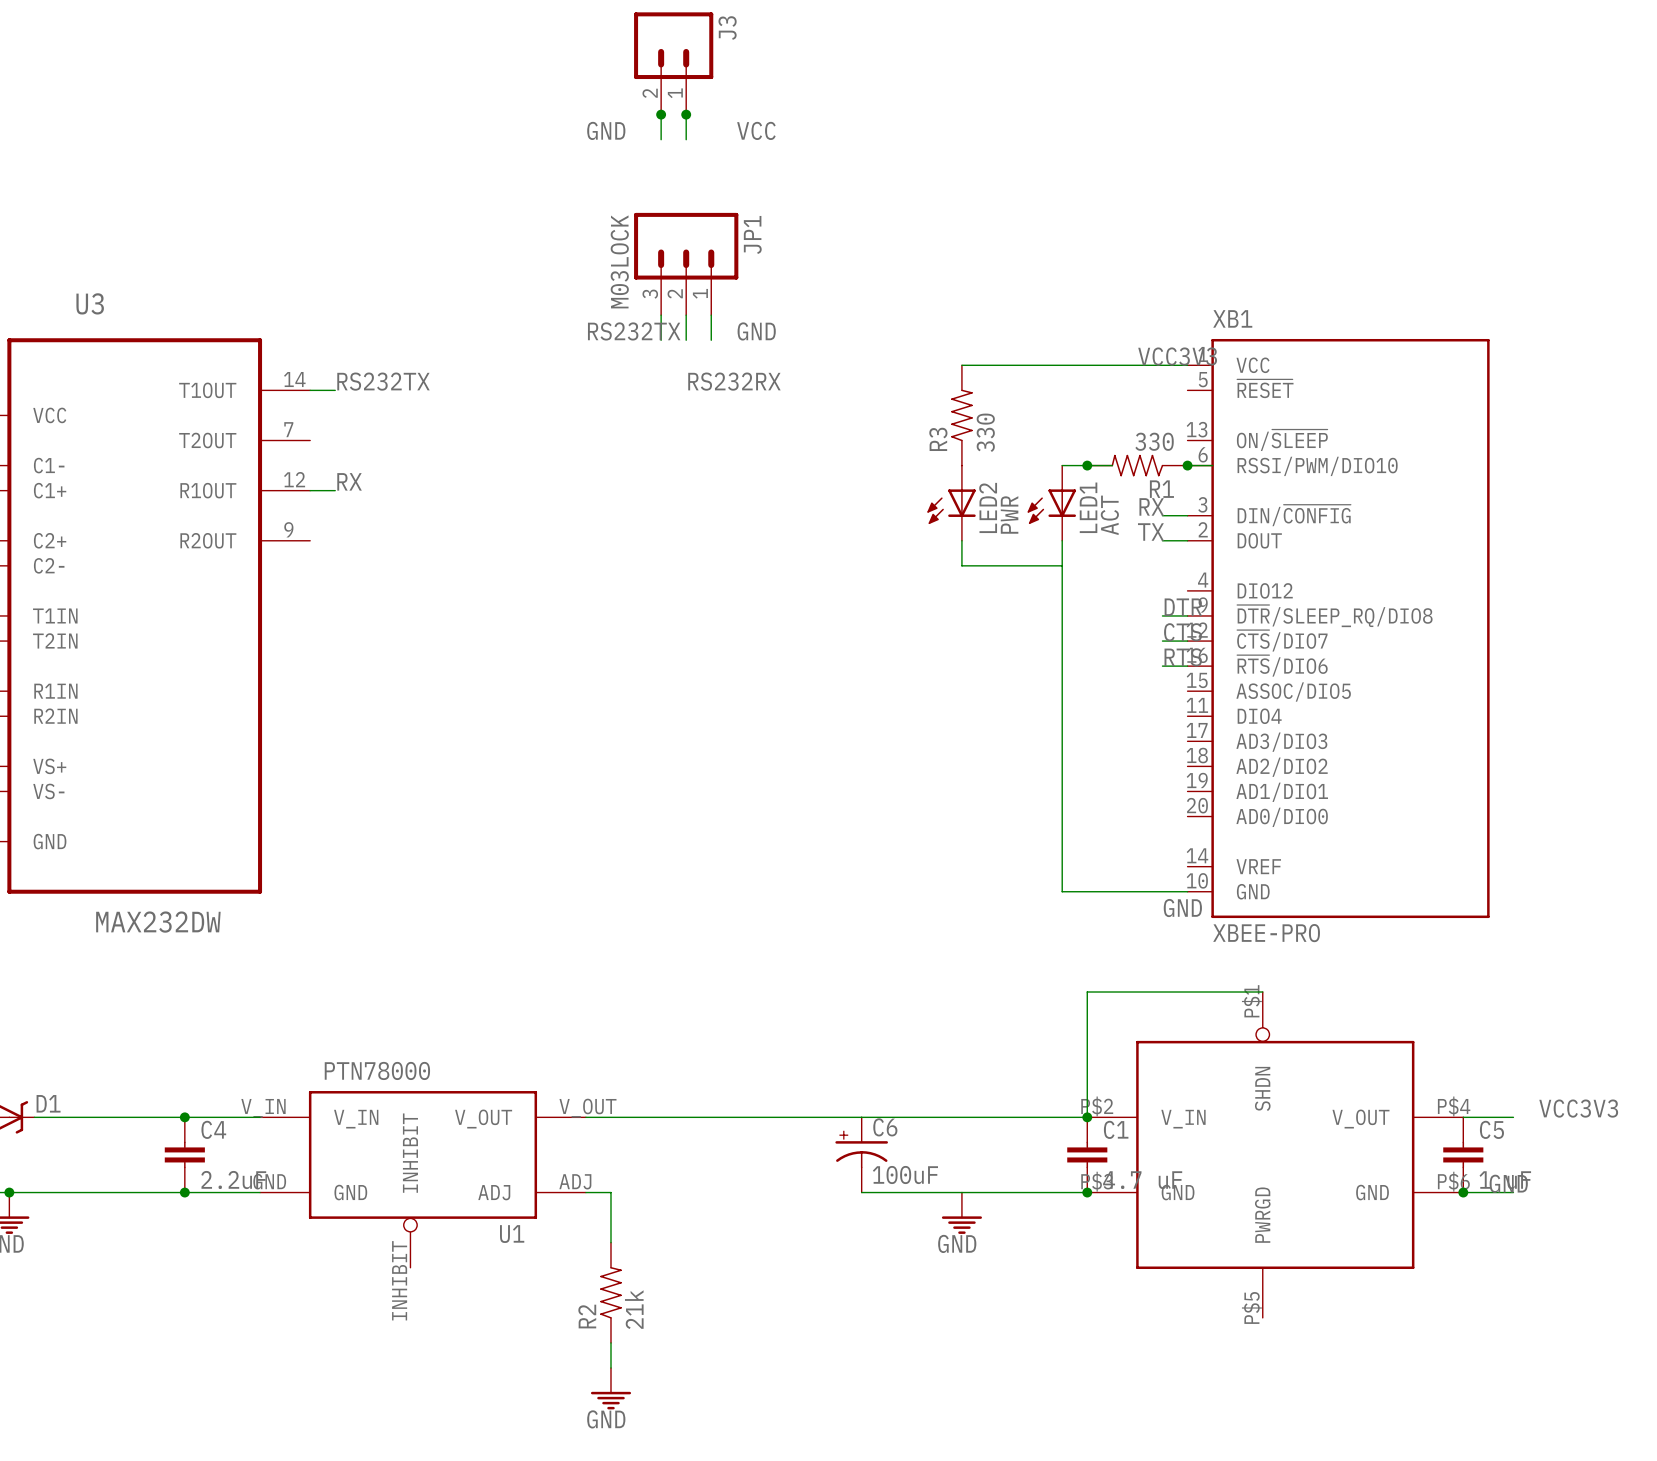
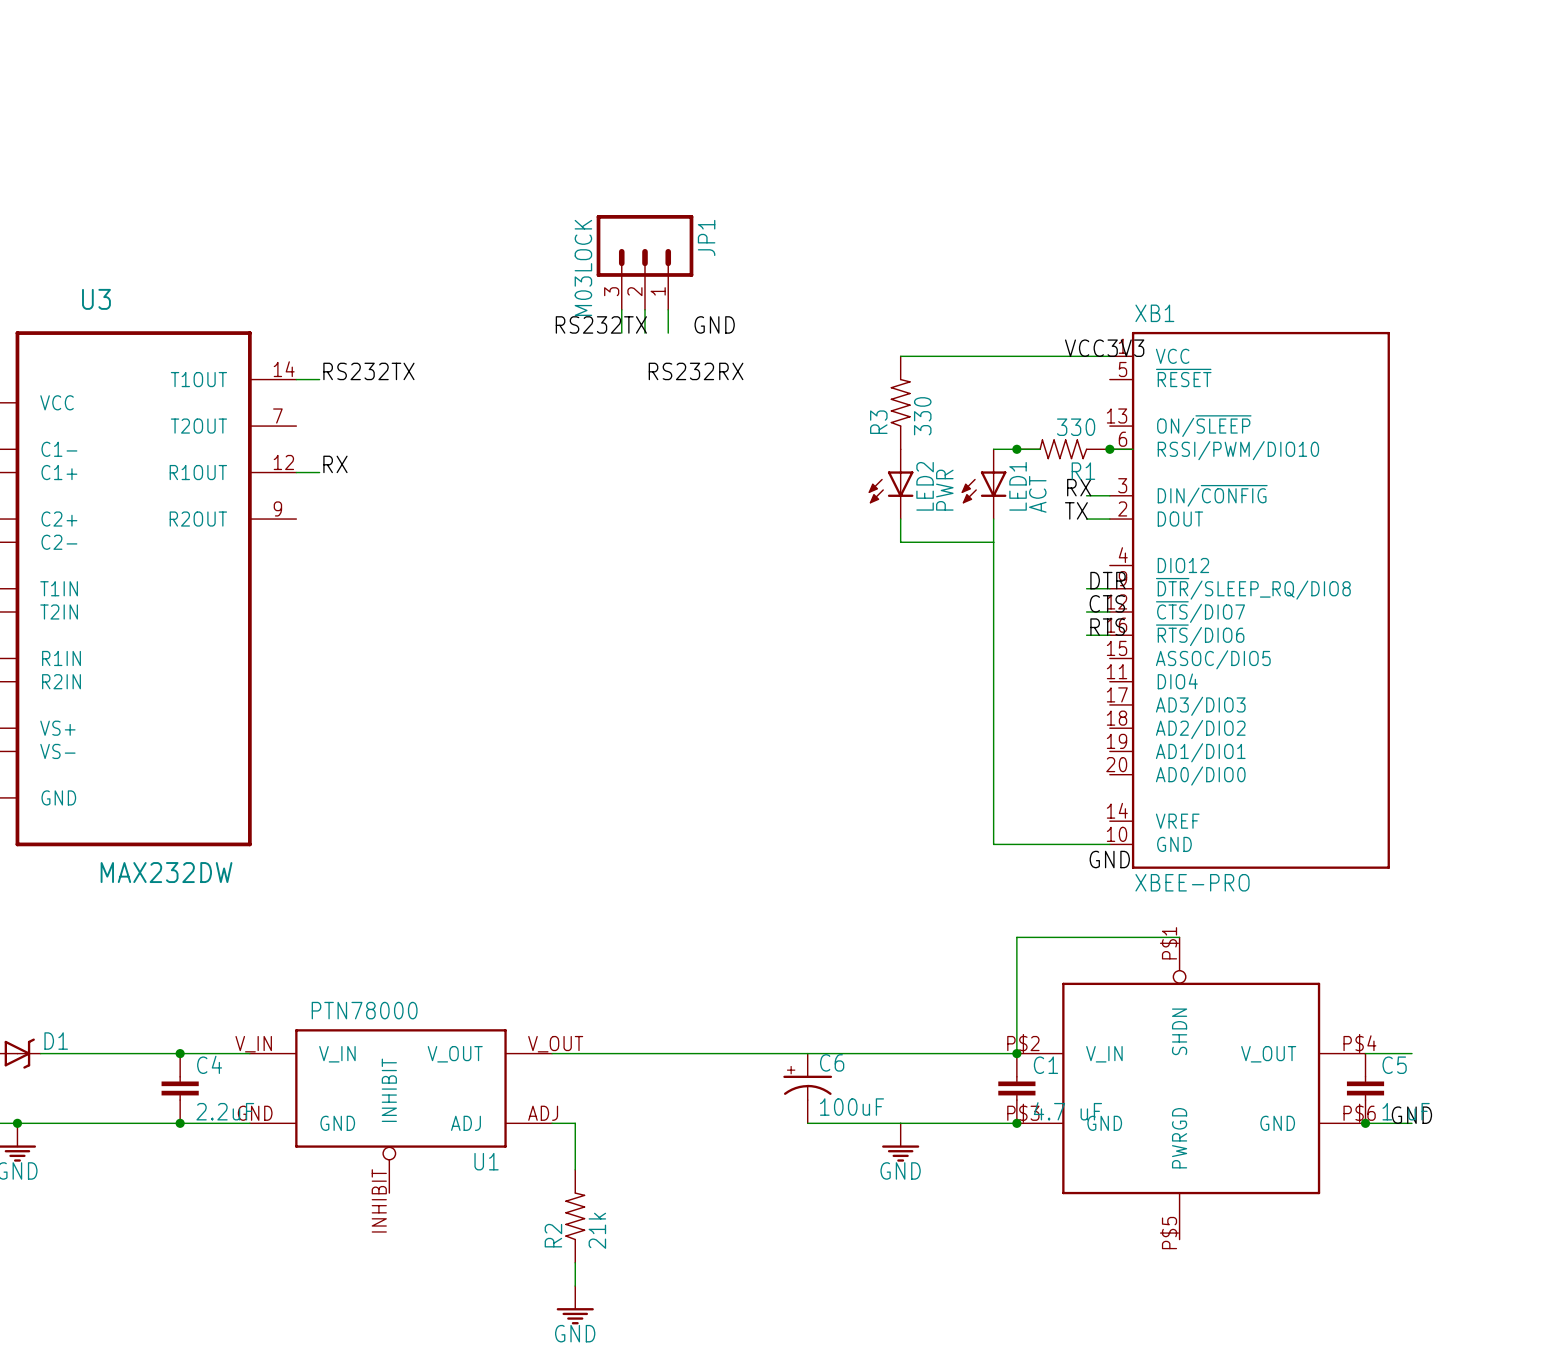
J3: (673, 63) -> none
wire: (661, 114) (661, 139) -> none
junction: (661, 114) -> none
wire: (686, 114) (686, 139) -> none
junction: (686, 114) -> none
label: GND (606, 130) -> none
label: VCC (756, 130) -> none
label: VCC3V3 (1578, 1108) -> none

